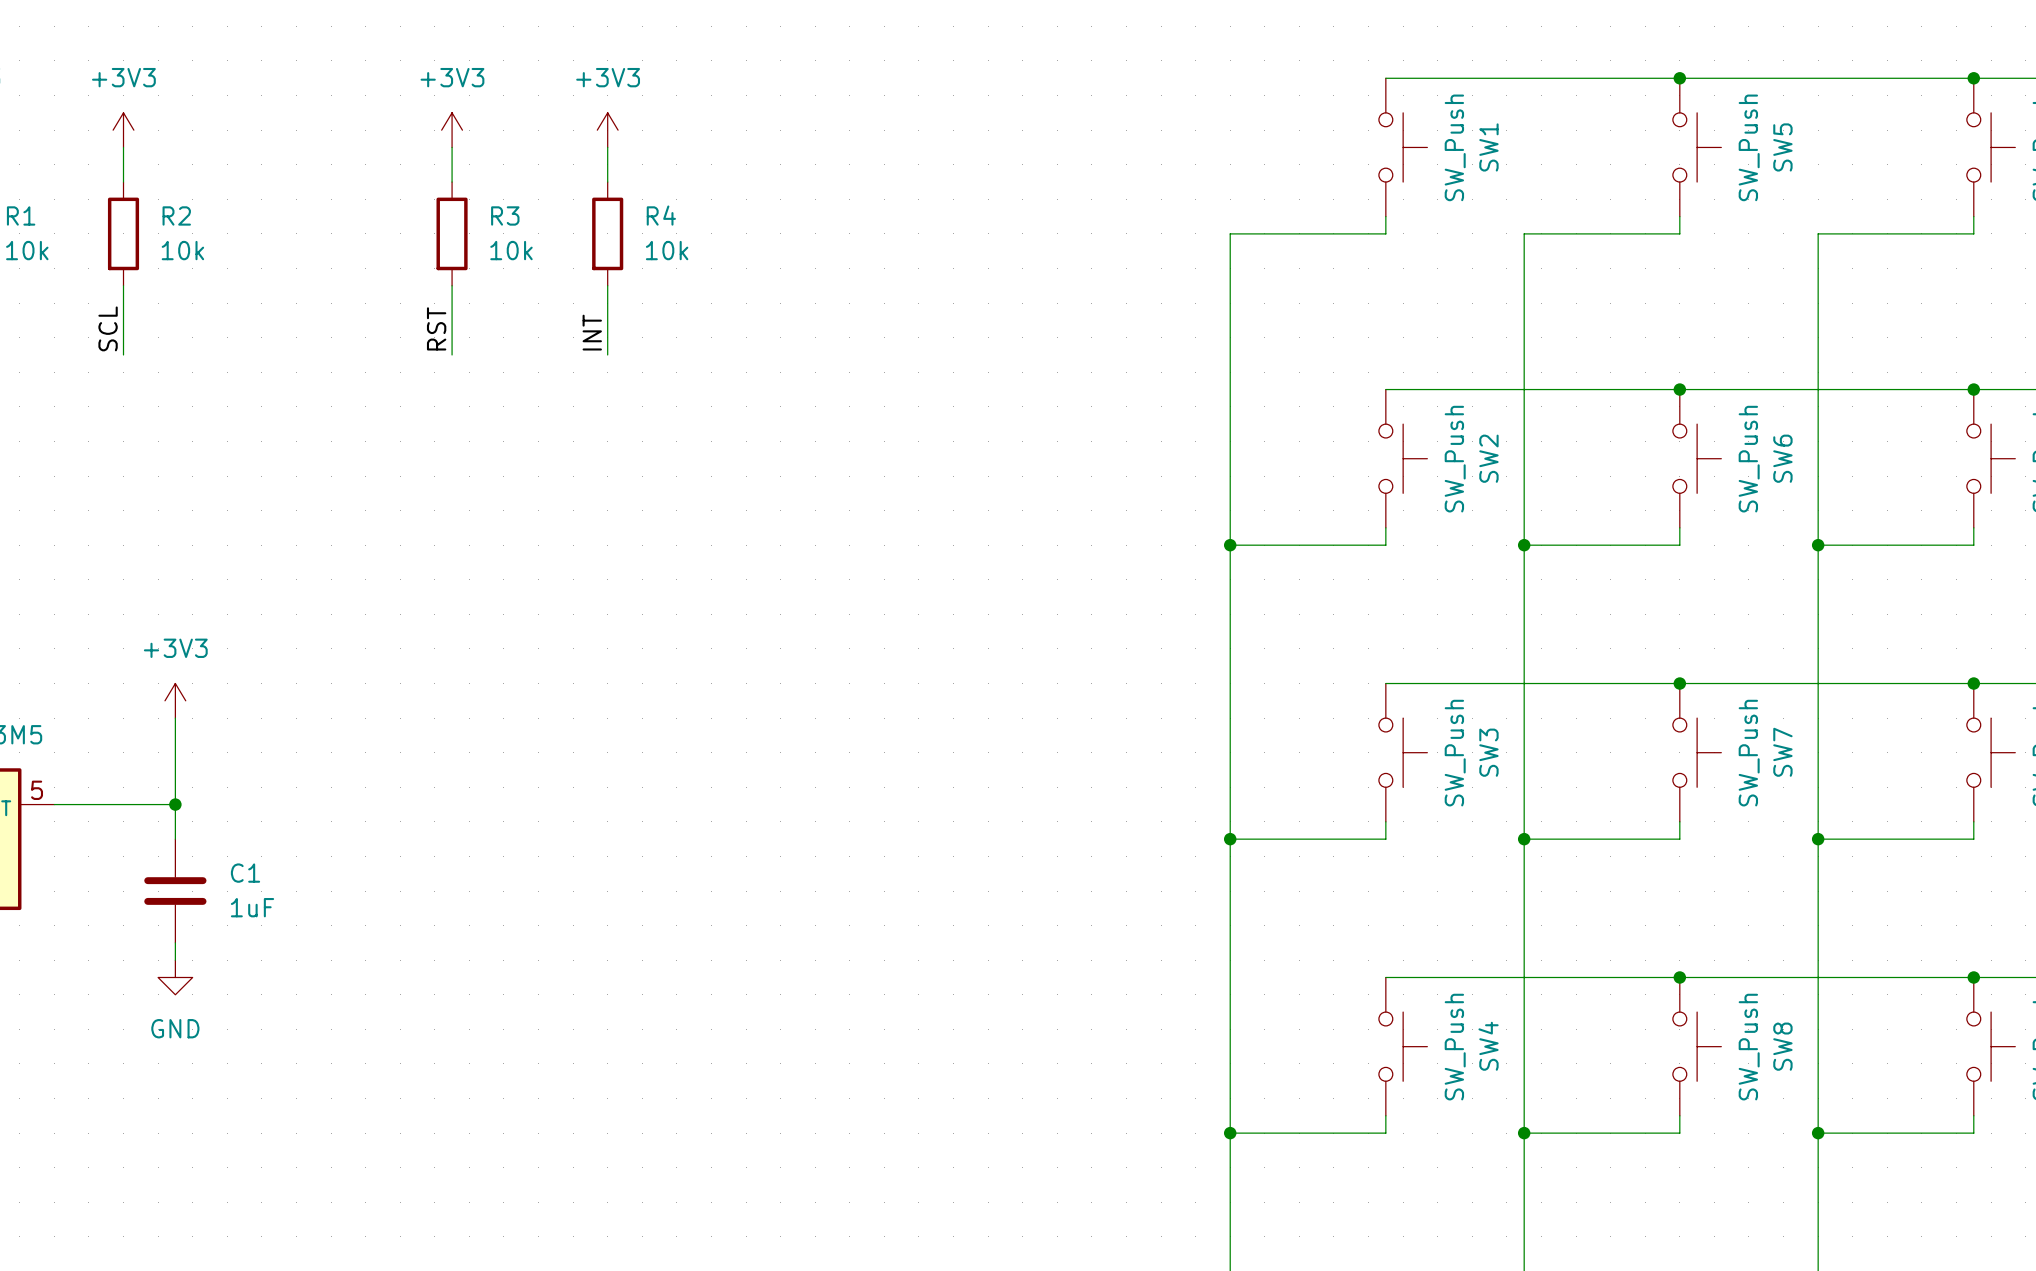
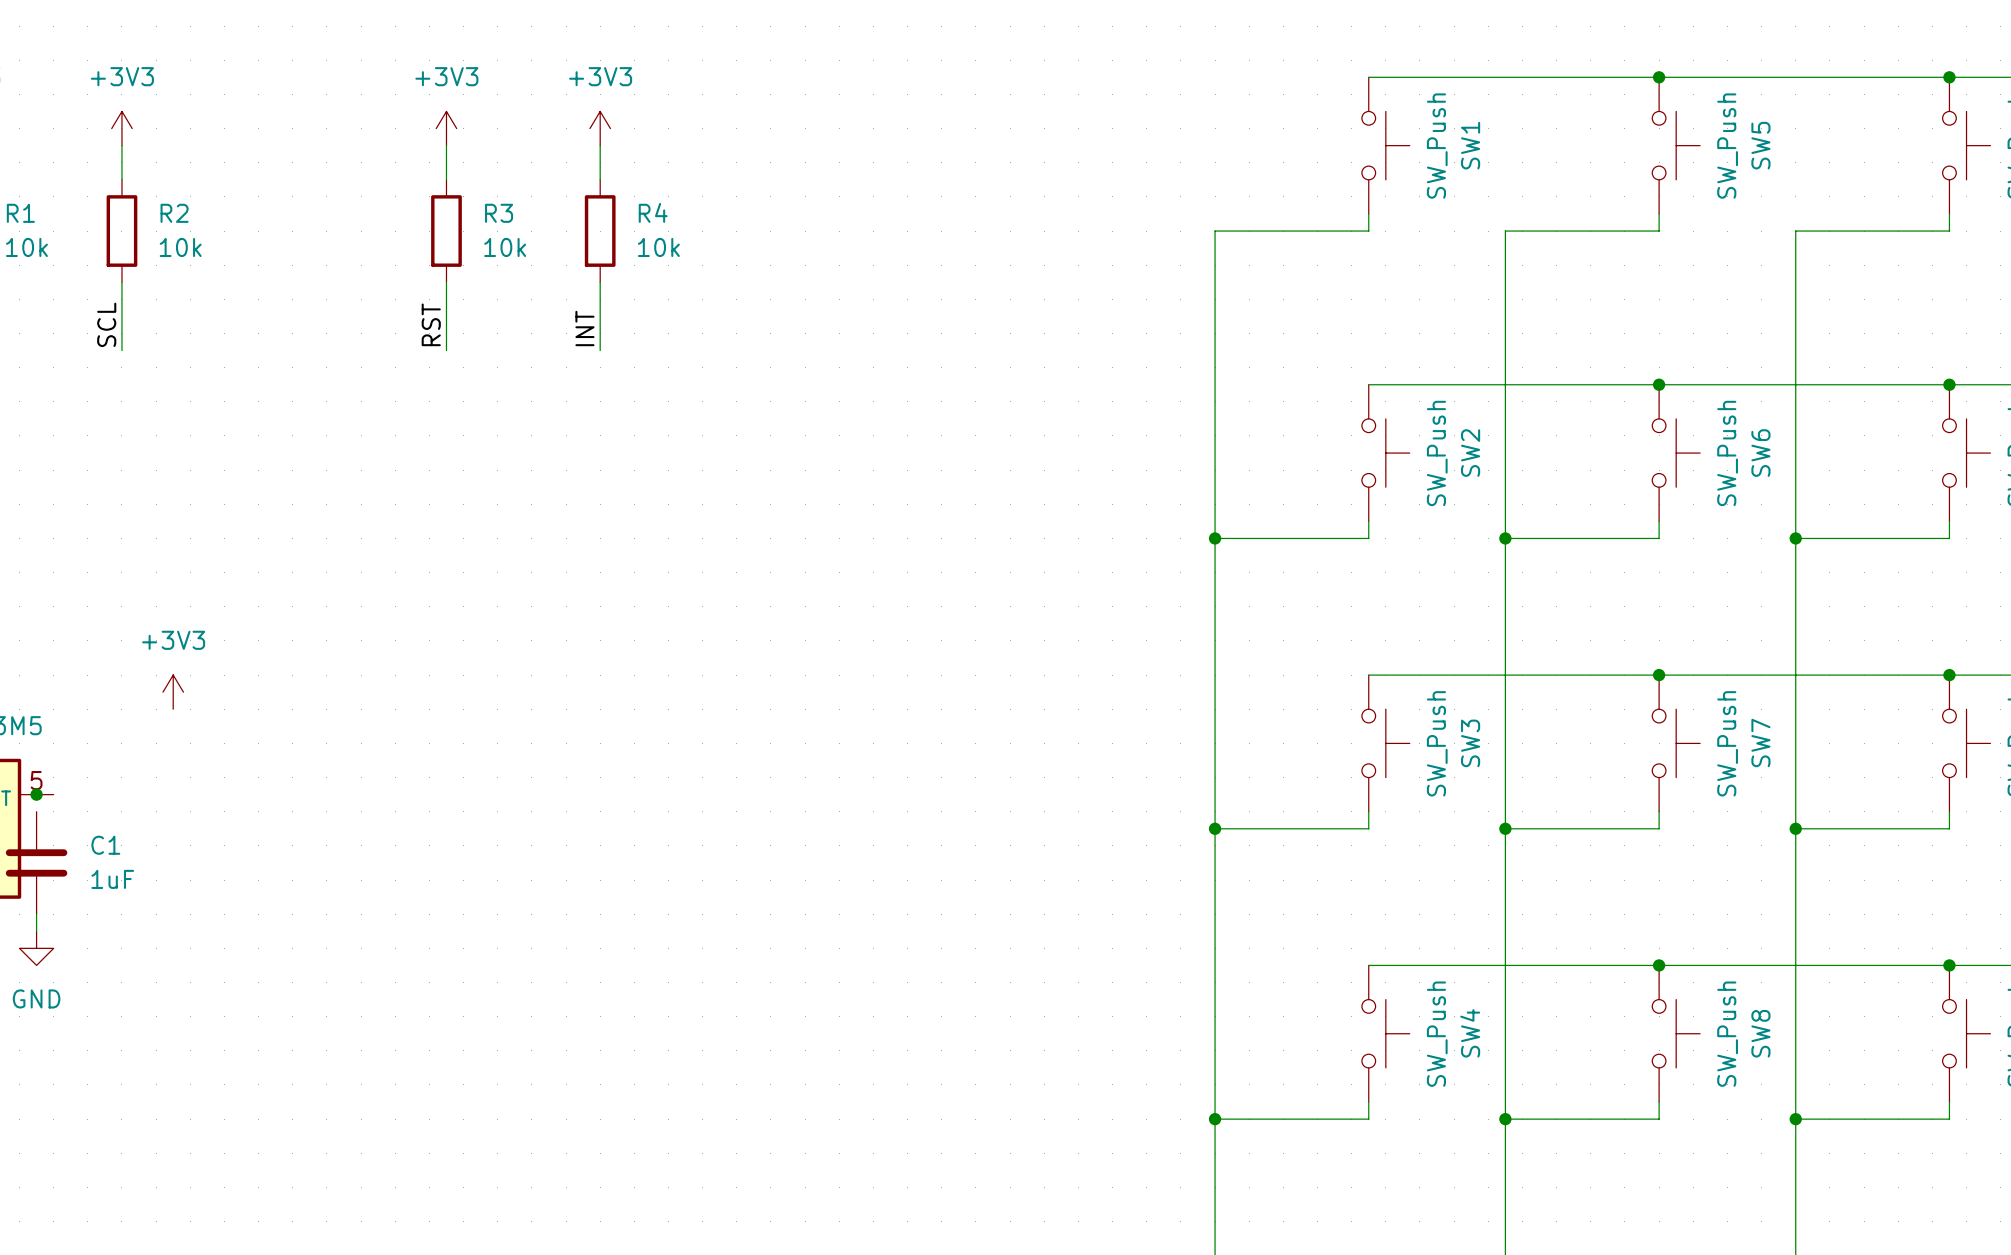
wire: (175, 718) (175, 839) -> none
junction: none -> (36, 794)
wire: (54, 804) (175, 804) -> none
junction: (175, 804) -> none
C1 position: (175, 891) -> (36, 862)
wire: (175, 942) (175, 960) -> (36, 914) (36, 931)
power symbol: none -> GND (36, 948)
power symbol: GND (175, 977) -> none

